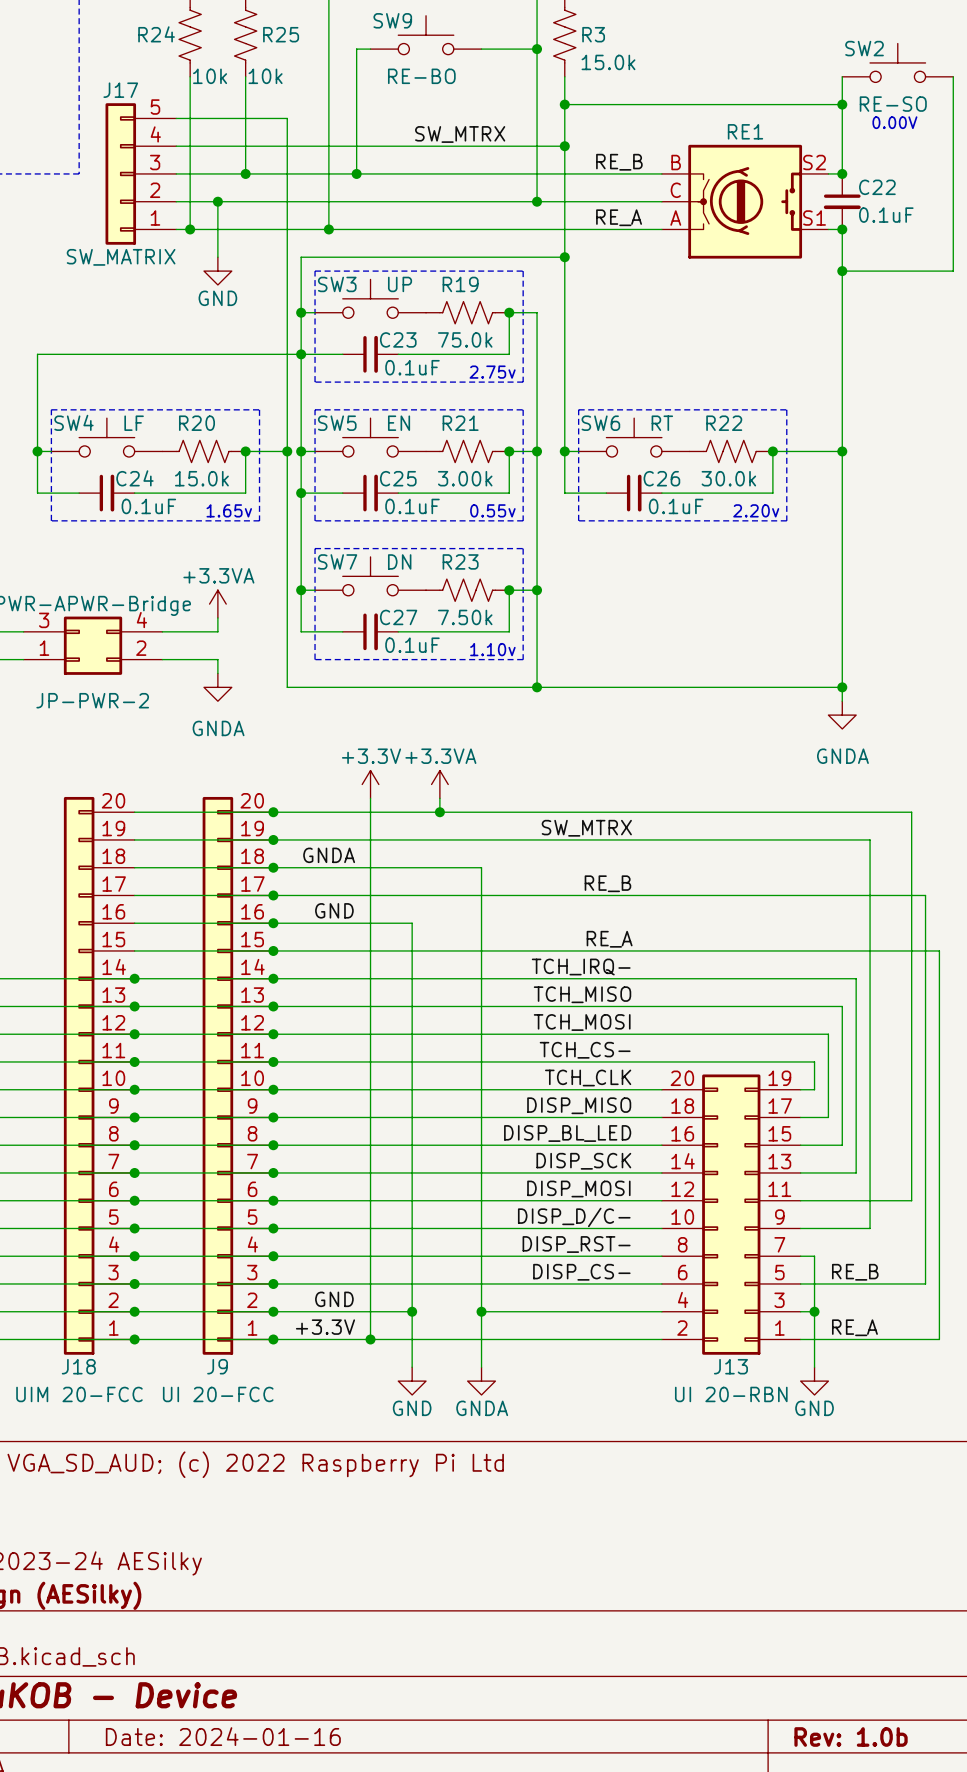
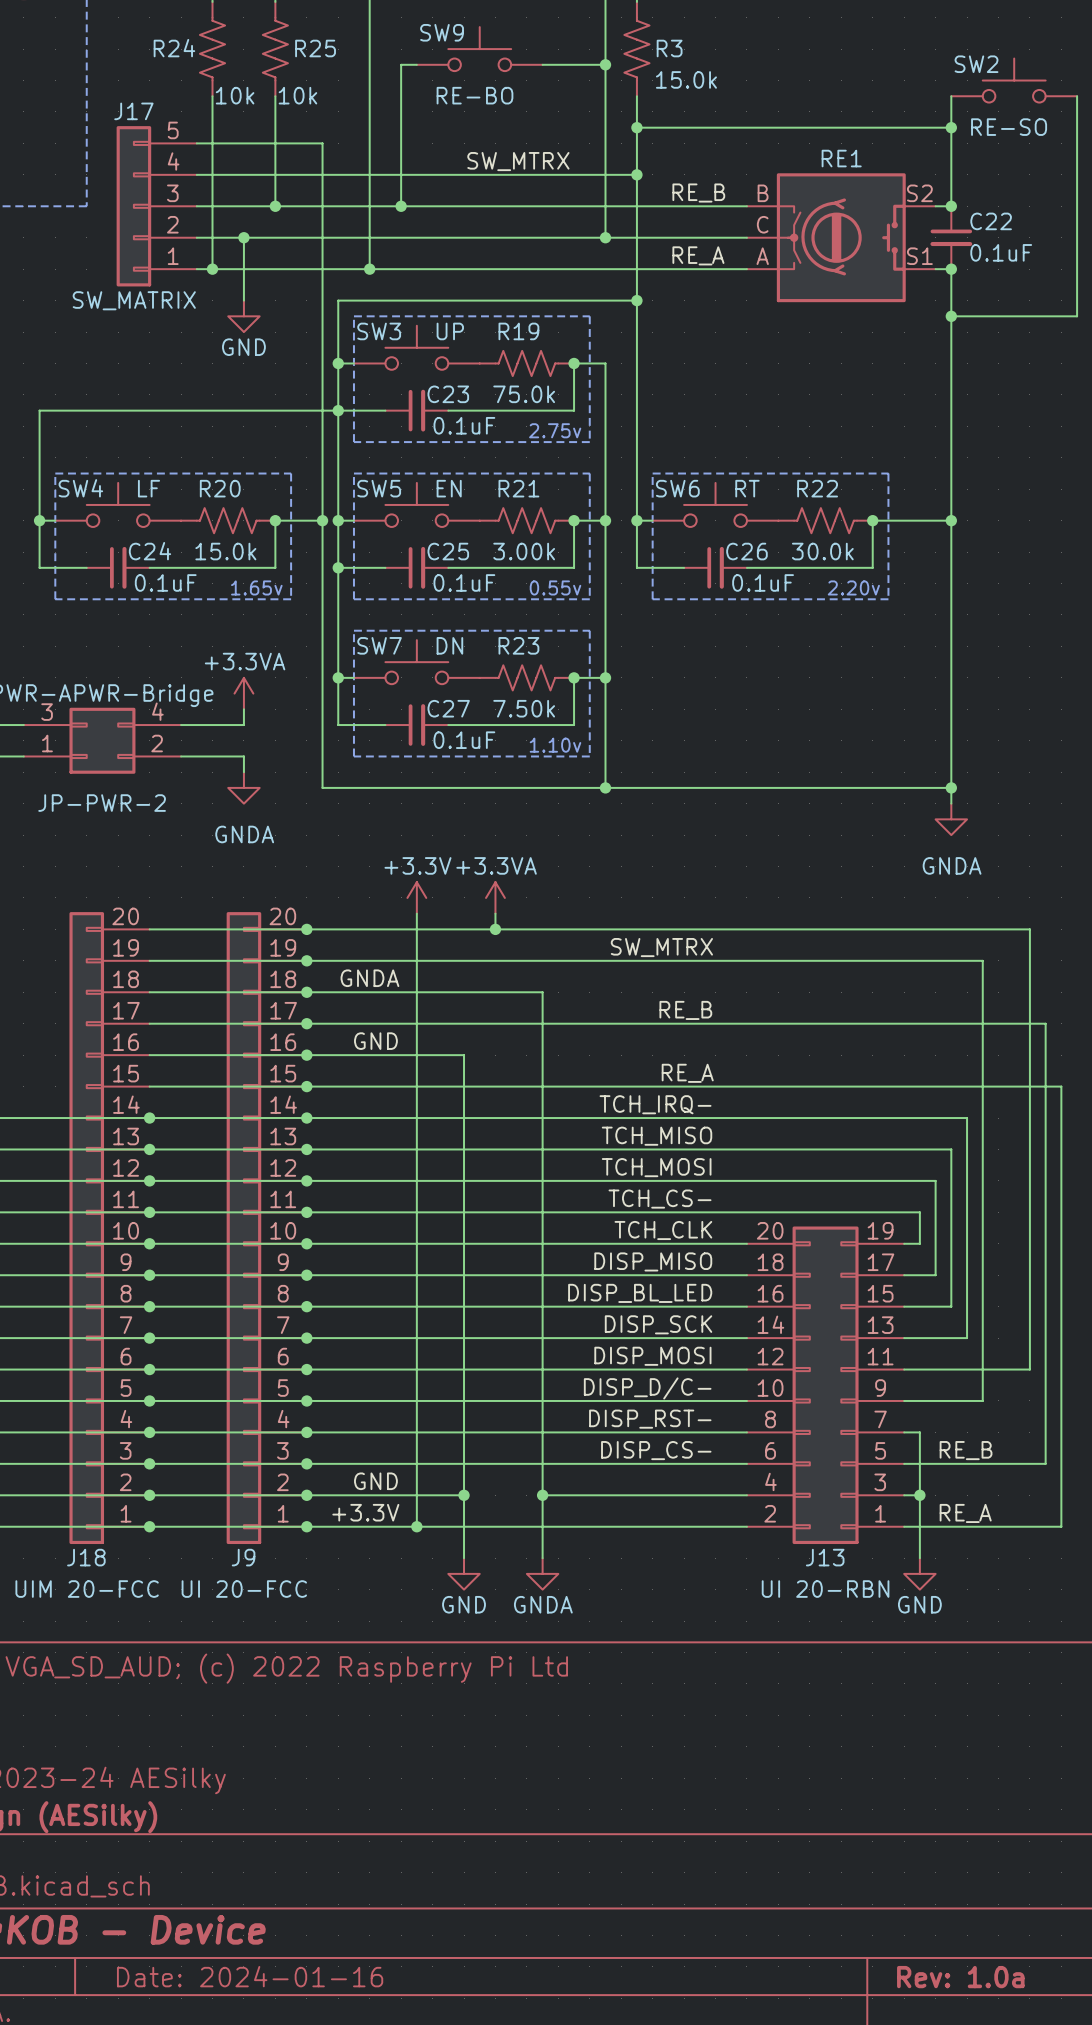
text: 0.00V (894, 122) -> none
title block: Rev: 1.0b (851, 1736) -> Rev: 1.0a (960, 1977)

